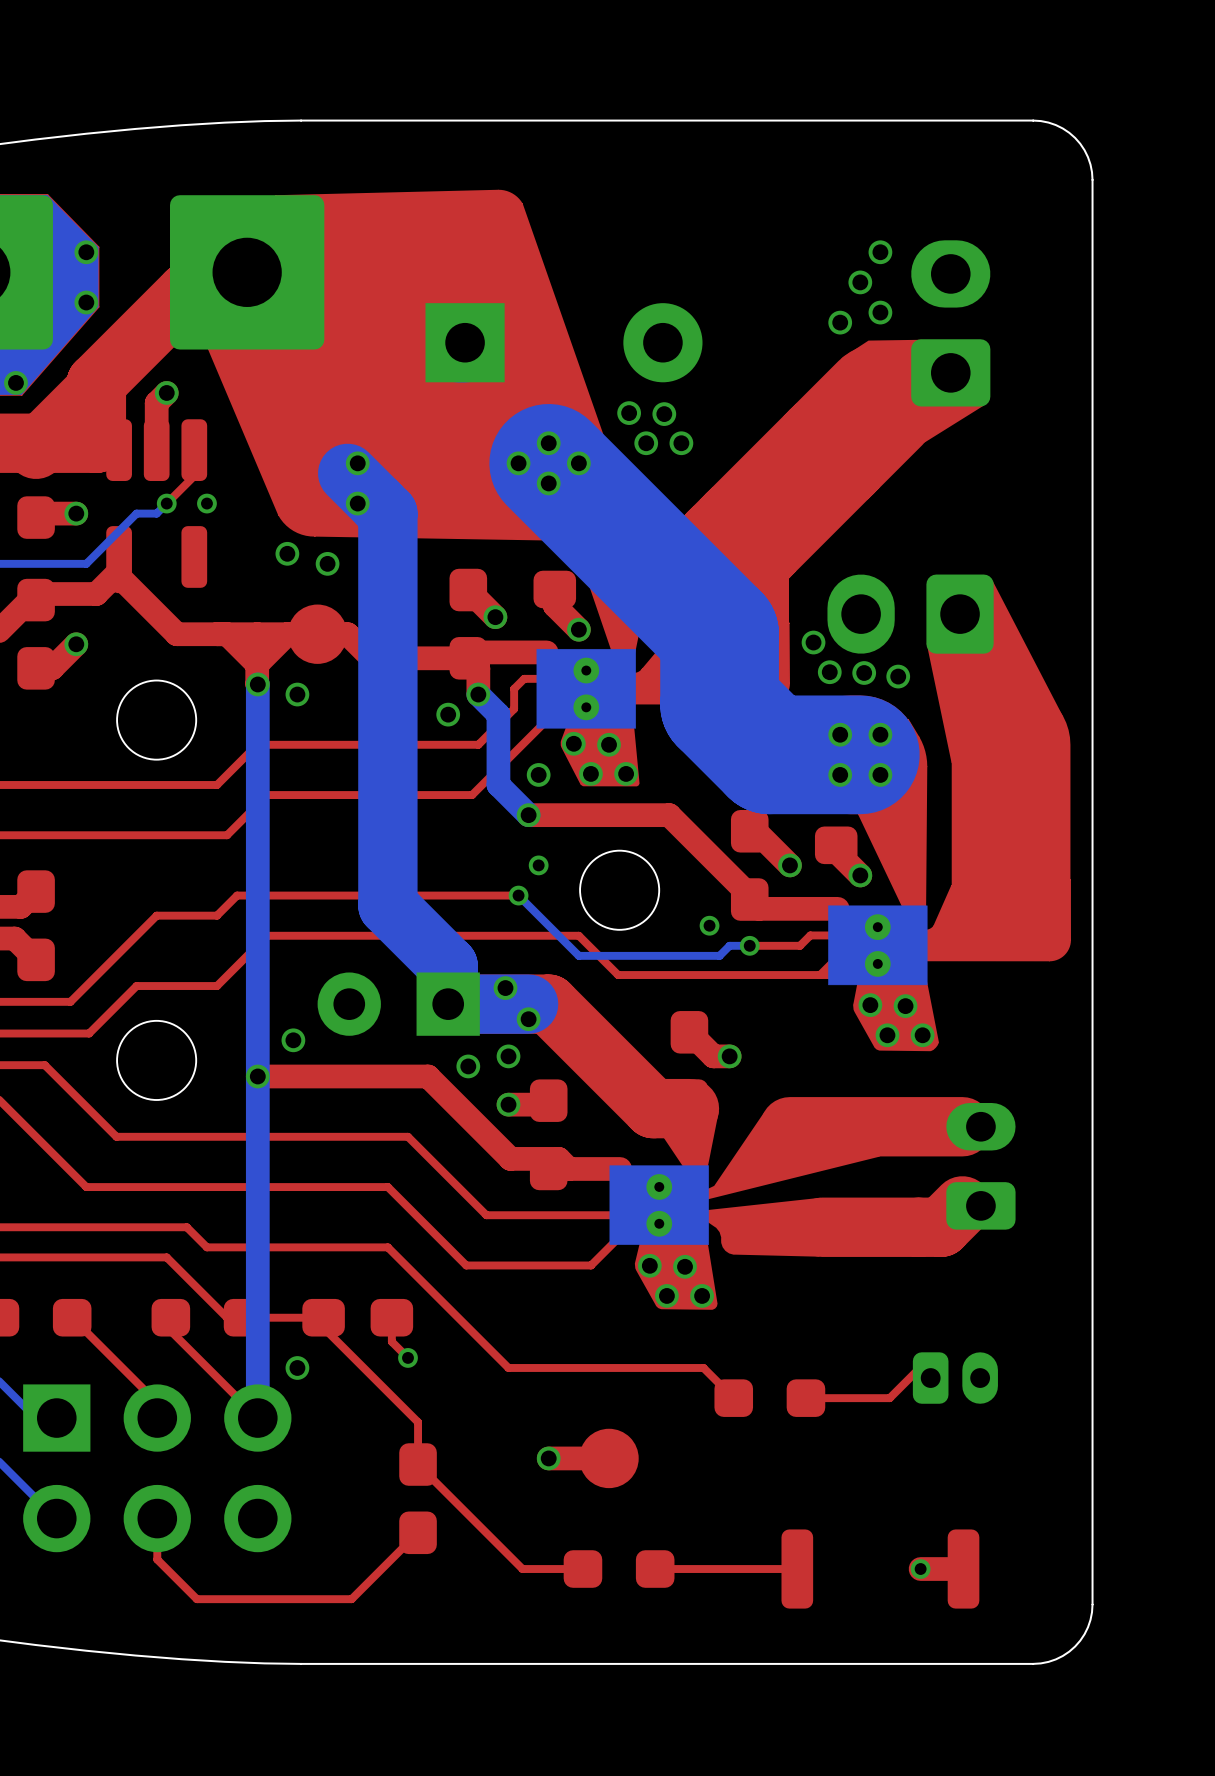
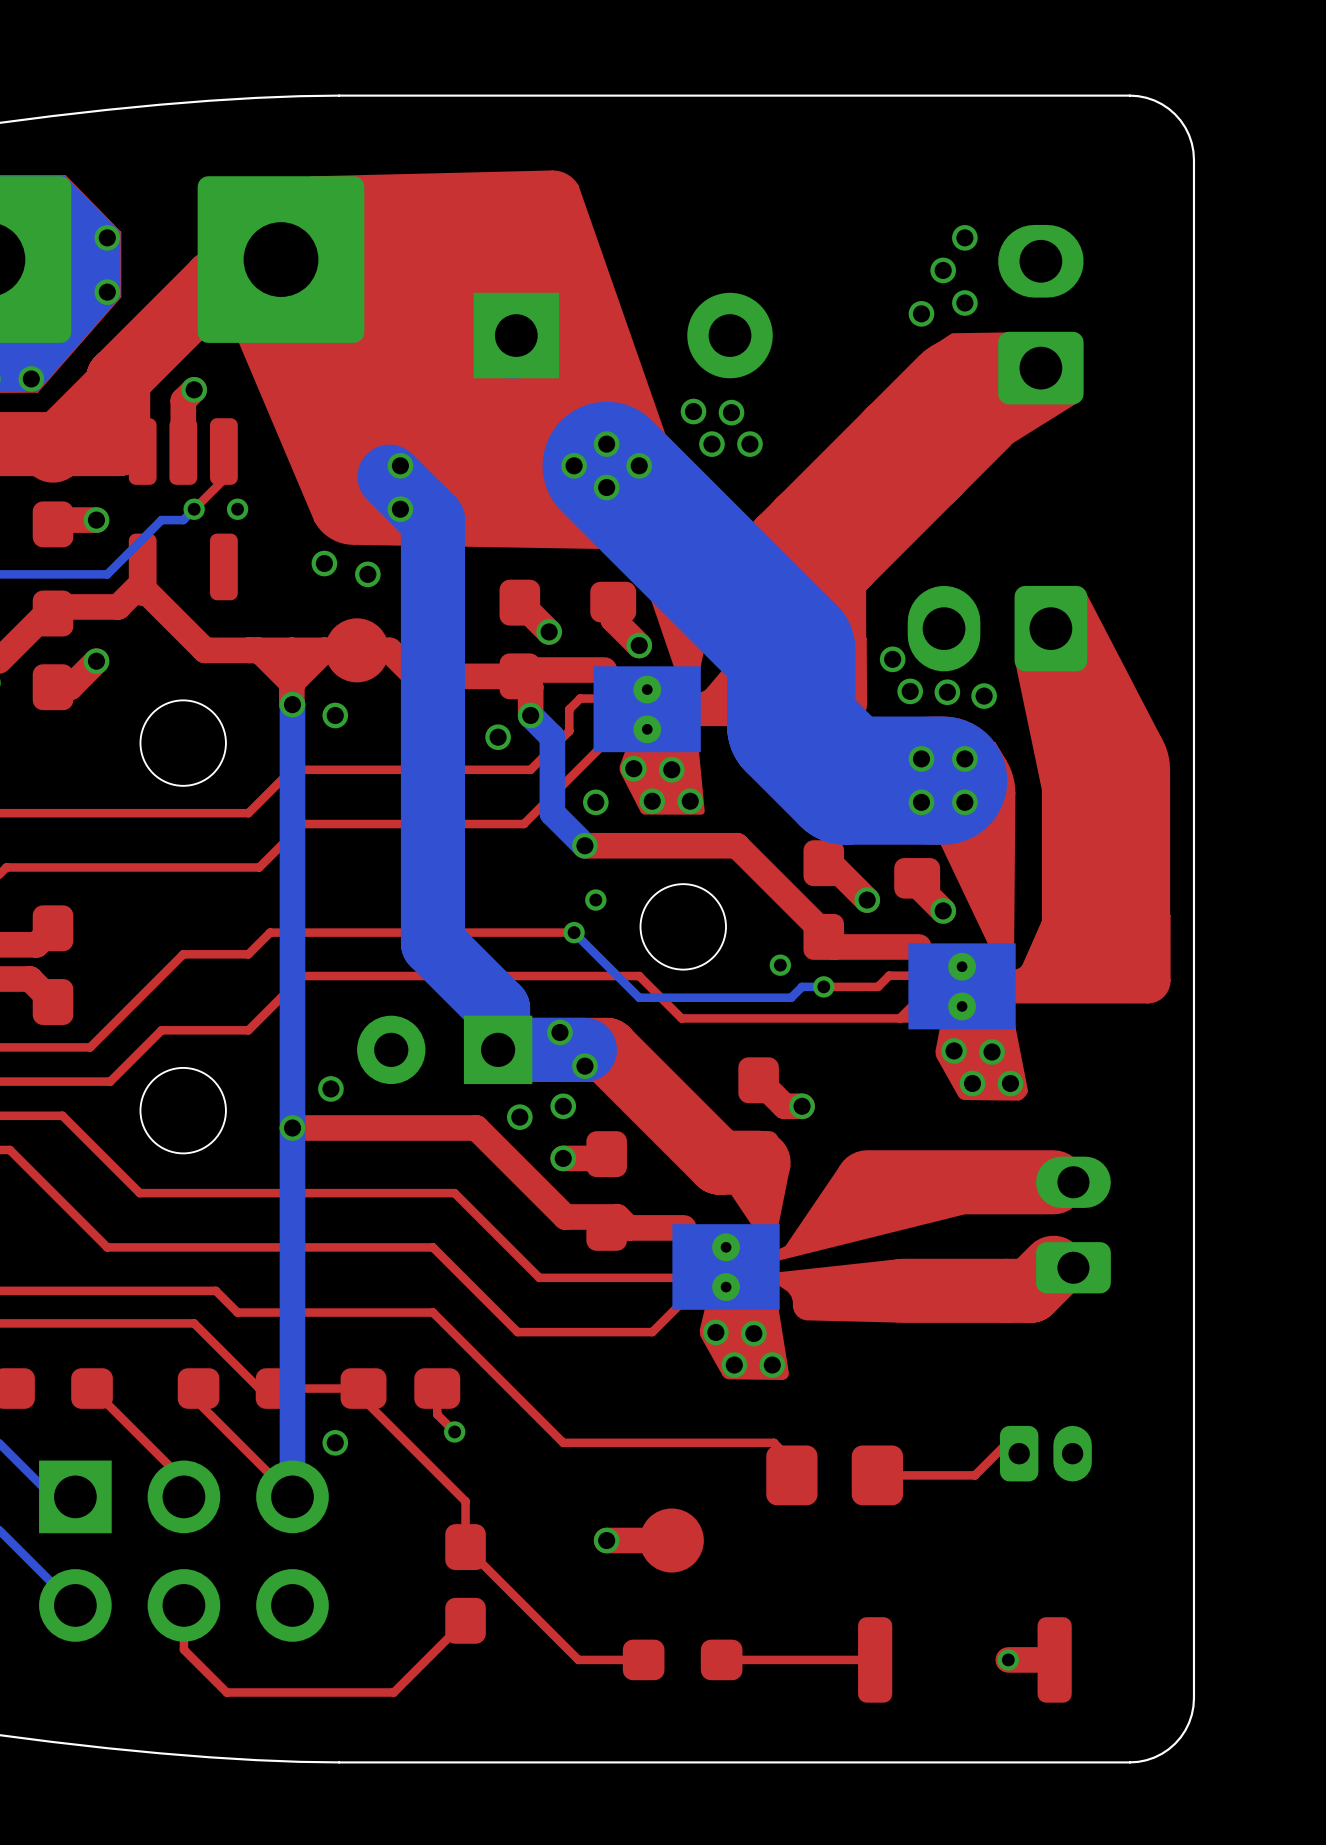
part footprint: [714, 1379, 826, 1417] -> [766, 1445, 904, 1506]

